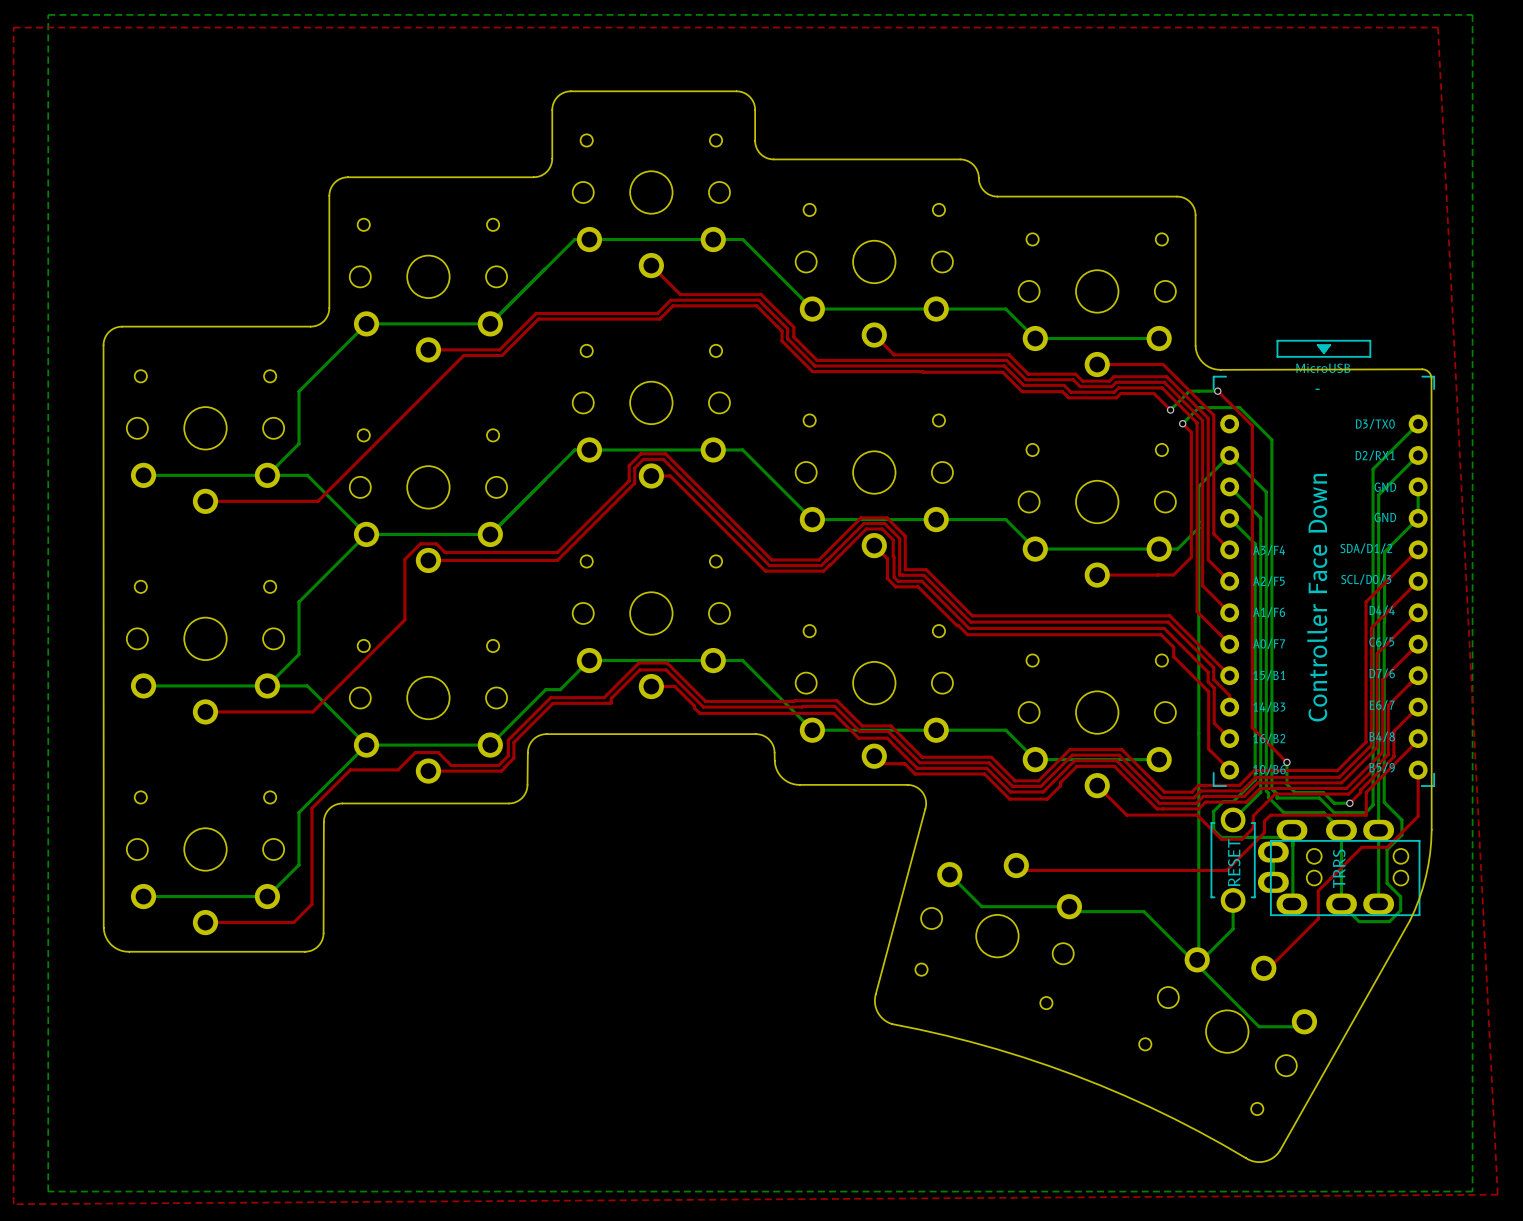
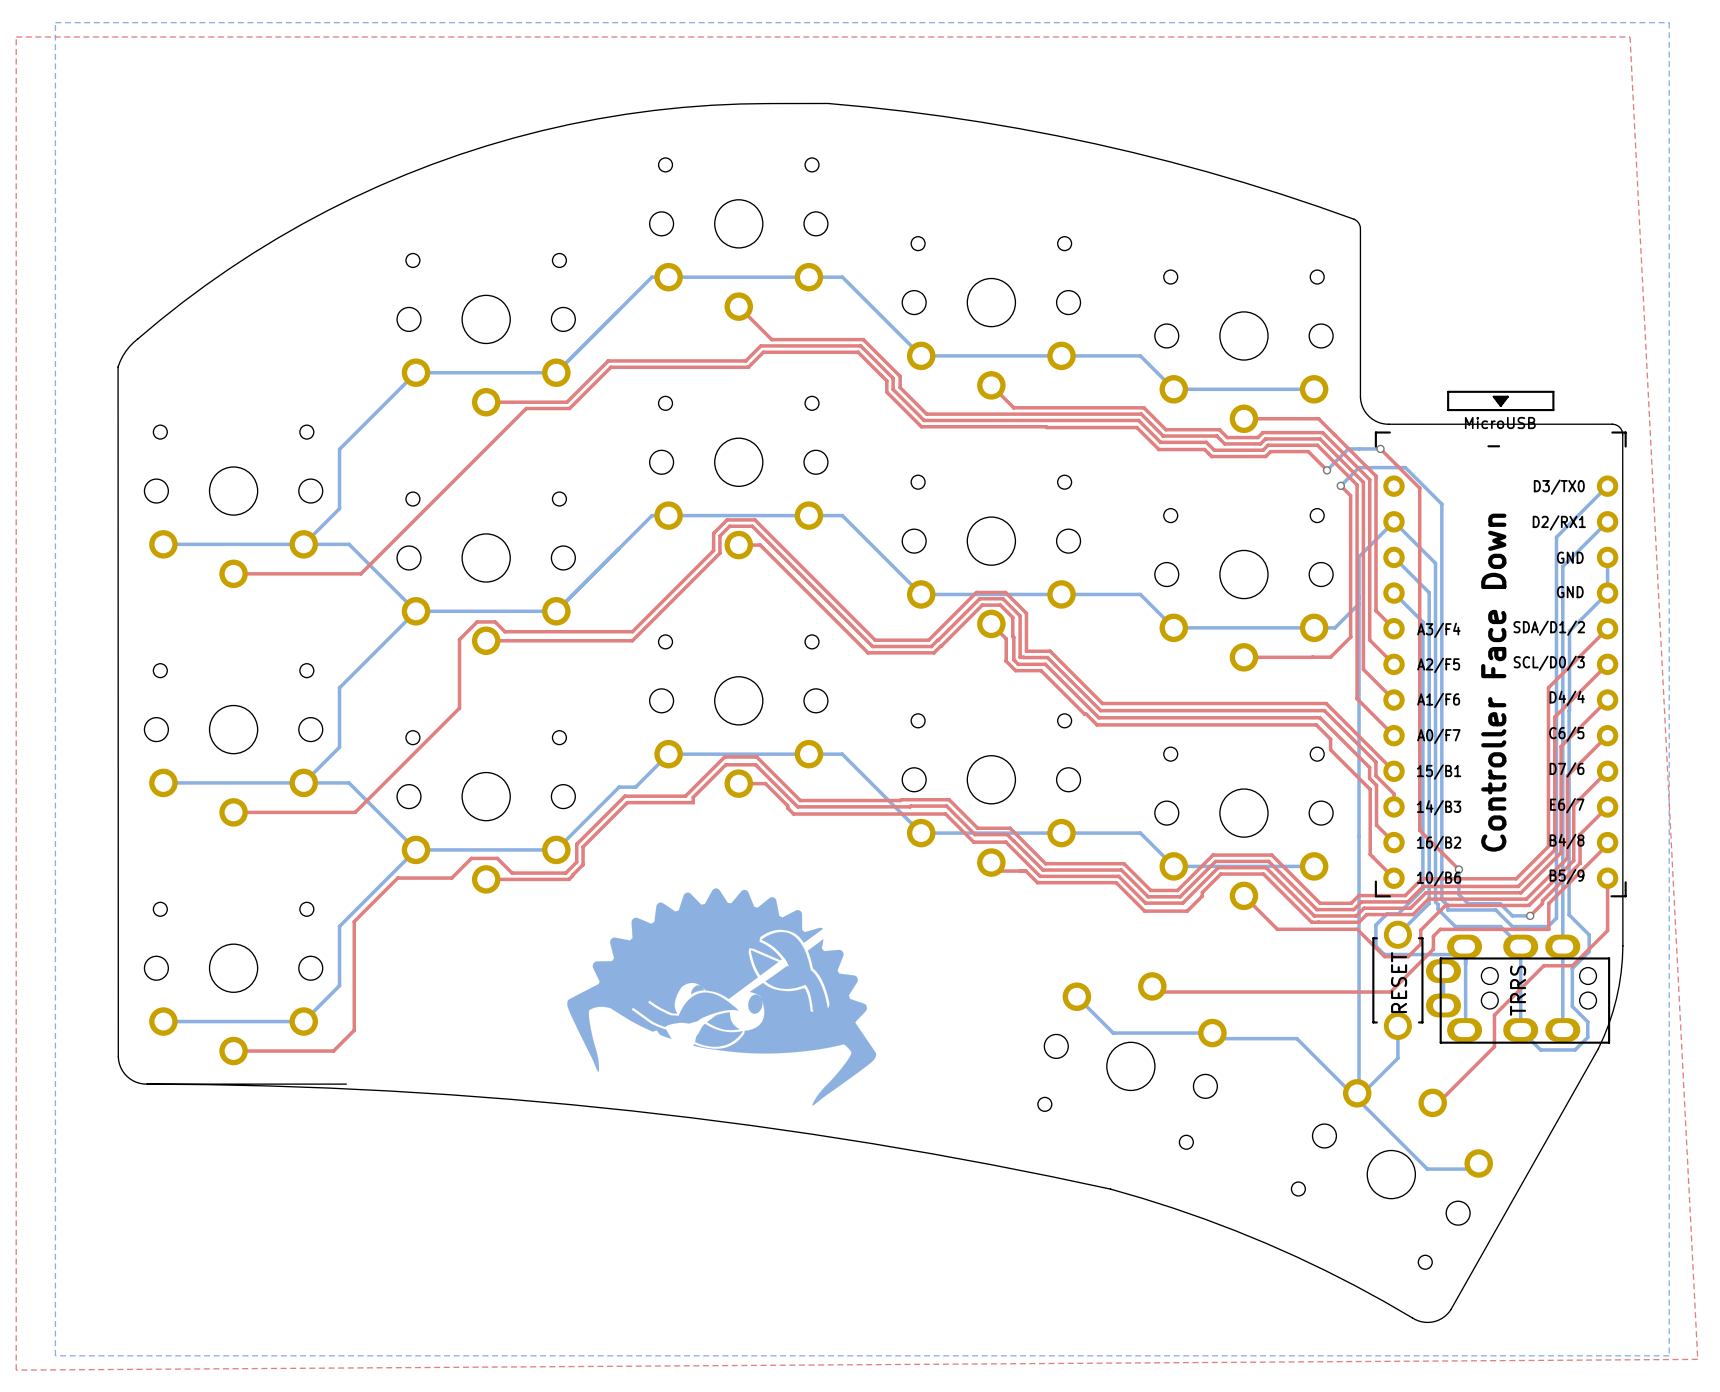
board edge: none -> (138, 338) (125, 351) (118, 366) (118, 1057)
board edge: (1431, 378) (1428, 372) (1422, 369) (1220, 369) (1211, 368) (1201, 360) (1195, 349) (1195, 215) (1193, 205) (1186, 199) (1177, 196) (994, 196) (982, 189) (974, 166) (962, 159) (768, 158) (760, 153) (755, 145) (753, 102) (747, 95) (738, 91) (563, 92) (556, 98) (552, 107) (551, 163) (546, 171) (538, 176) (340, 178) (333, 184) (329, 193) (329, 308) (326, 317) (322, 322) (310, 326) (119, 326) (110, 330) (104, 340) (103, 927) -> (1622, 434) (1619, 427) (1612, 424) (1388, 424) (1371, 418) (1362, 407) (1360, 397) (1360, 228) (1358, 223) (1354, 219) (1244, 182) (1095, 143) (981, 122) (828, 103) (711, 105) (626, 114) (542, 130) (459, 154) (405, 174) (353, 197) (277, 238) (205, 285) (138, 338)
drawing: none -> [567, 888, 877, 1106]
board edge: (305, 951) (316, 947) (322, 937) (324, 819) (327, 810) (335, 804) (516, 802) (522, 798) (526, 789) (528, 746) (534, 738) (542, 734) (760, 734) (772, 743) (776, 770) (782, 778) (790, 783) (799, 784) (909, 785) (917, 787) (924, 796) (925, 808) (875, 997) (876, 1009) (883, 1019) (892, 1024) (997, 1049) (1075, 1075) (1150, 1107) (1246, 1158) -> (147, 1084) (329, 1088) (450, 1094) (571, 1104) (691, 1117) (812, 1134) (991, 1164) (1110, 1189) (1204, 1219) (1265, 1243) (1325, 1270) (1412, 1318)

